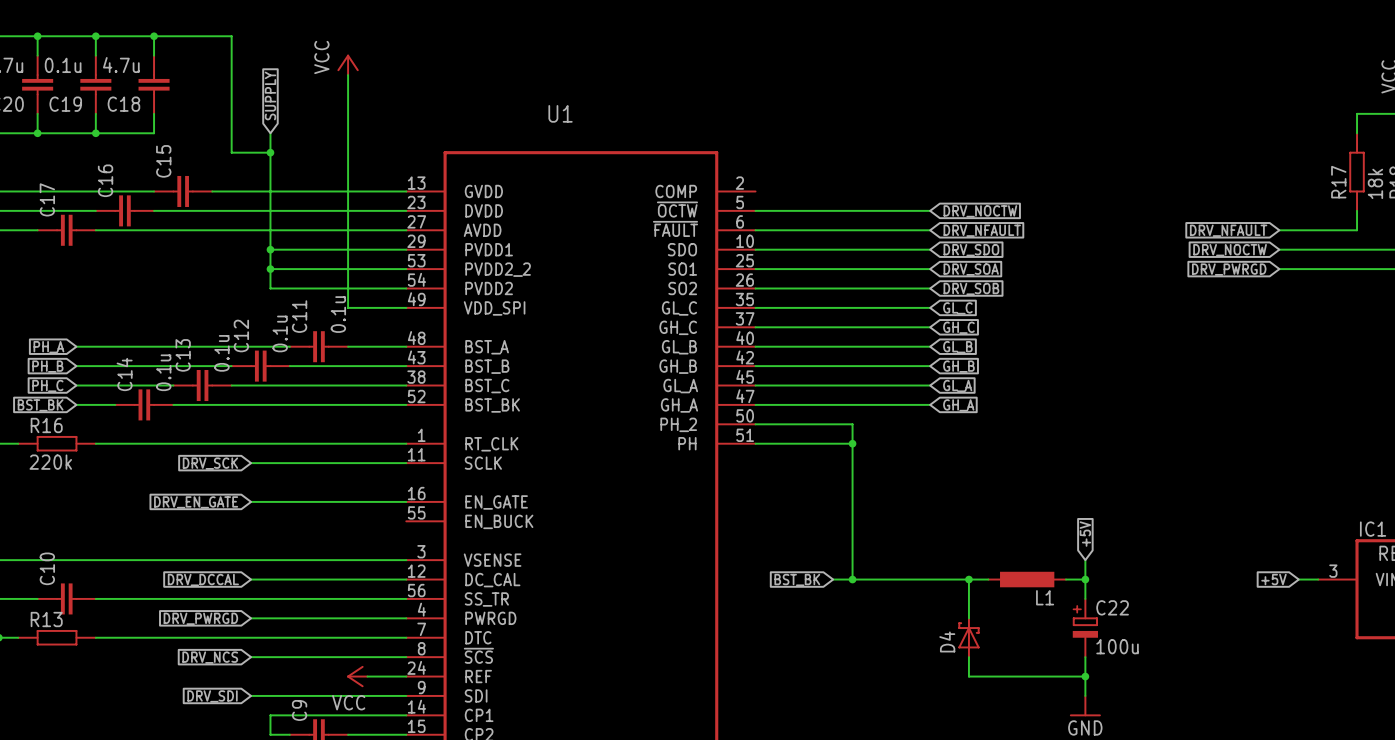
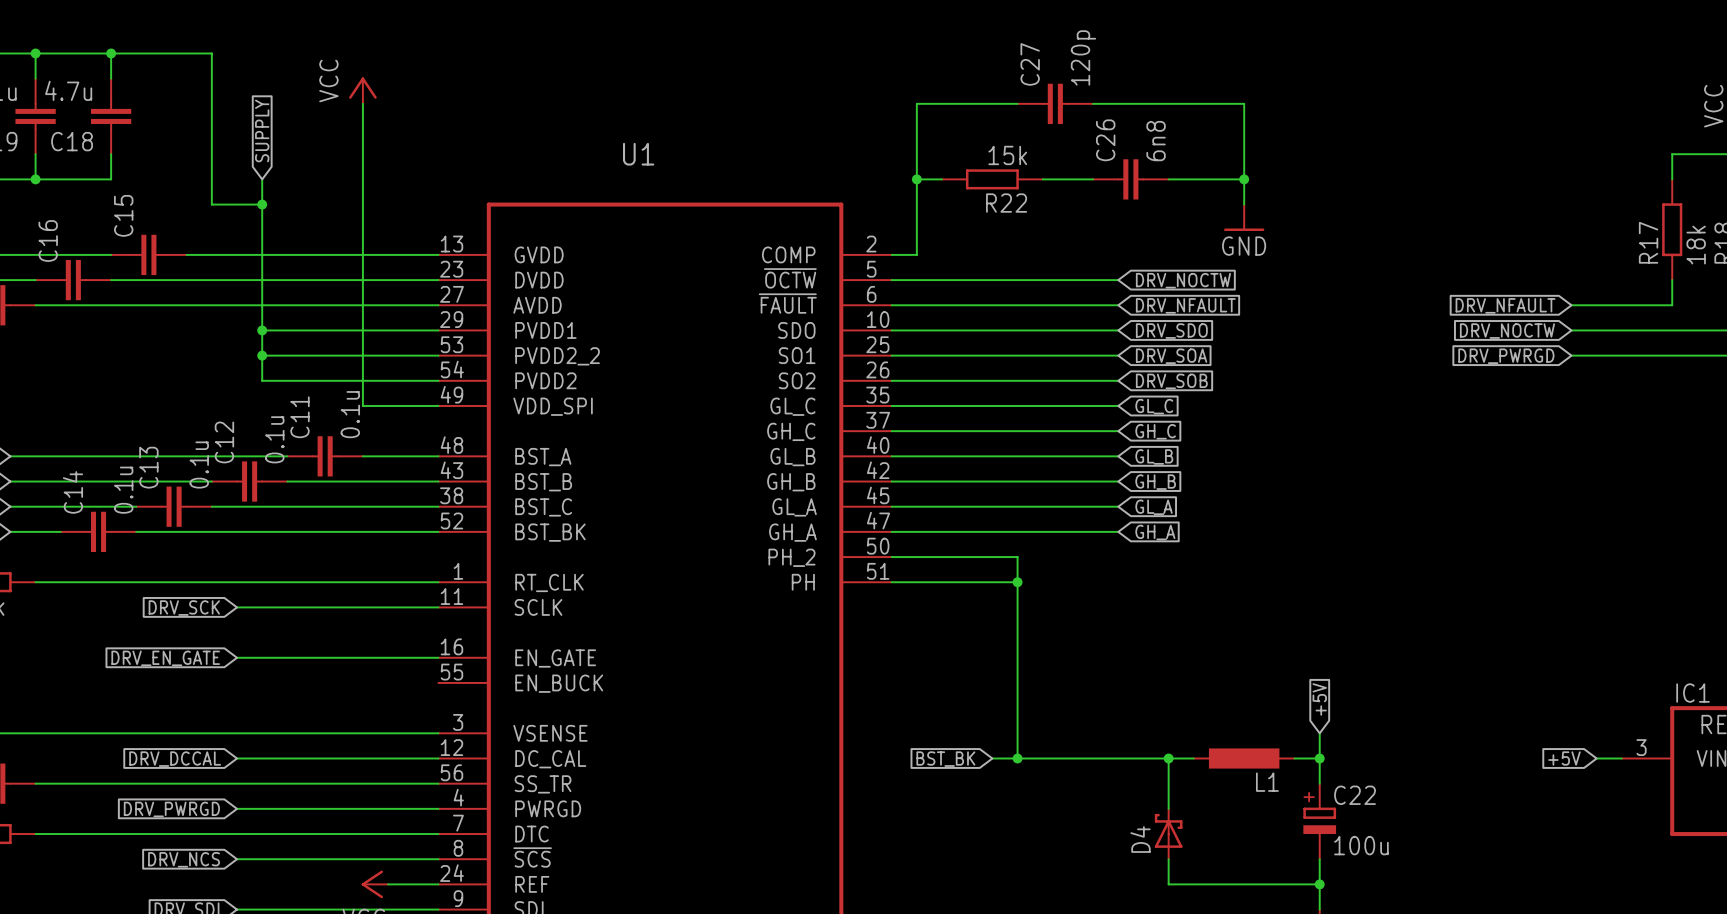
wire: none -> (1017, 103) (916, 103) (916, 254) (891, 254)
C27: none -> 120p (1055, 103)
wire: none -> (1093, 103) (1244, 103) (1244, 204)
wire: none -> (916, 179) (942, 179)
junction: none -> (916, 179)
R22: none -> 15k (992, 179)
wire: none -> (1042, 179) (1093, 179)
C26: none -> 6n8 (1130, 179)
wire: none -> (1168, 179) (1244, 179)
junction: none -> (1244, 179)
power symbol: none -> GND (1244, 217)

